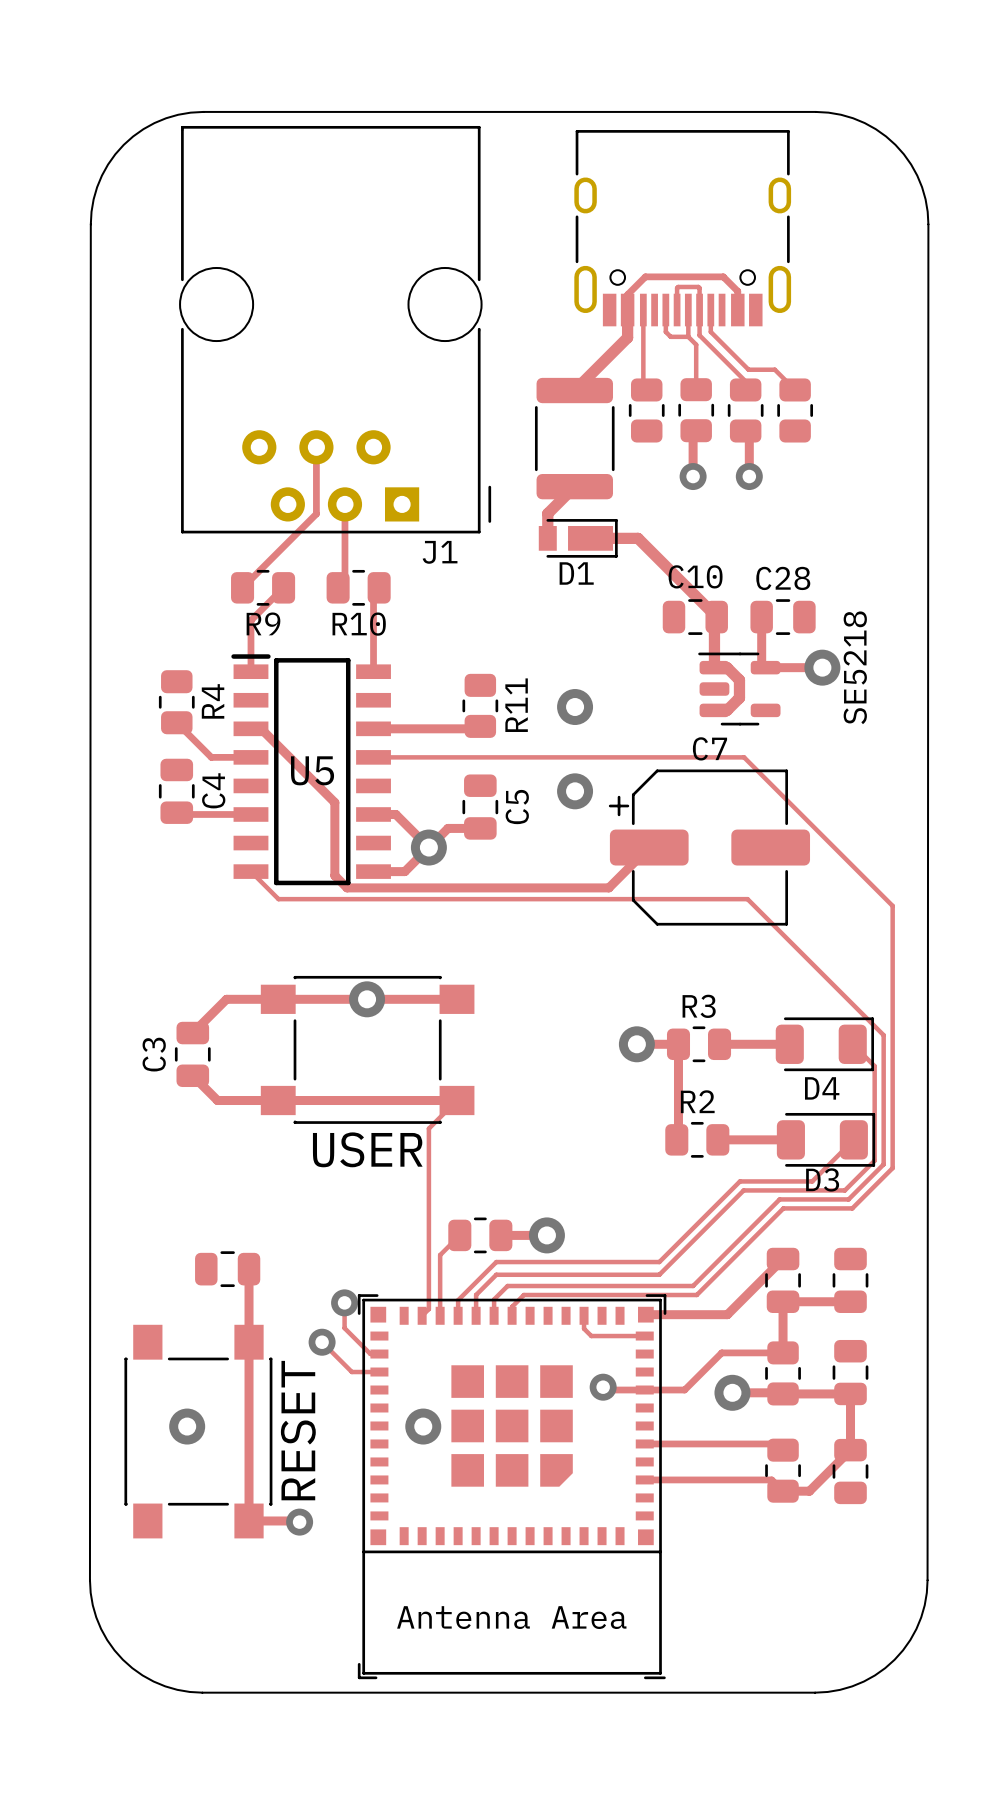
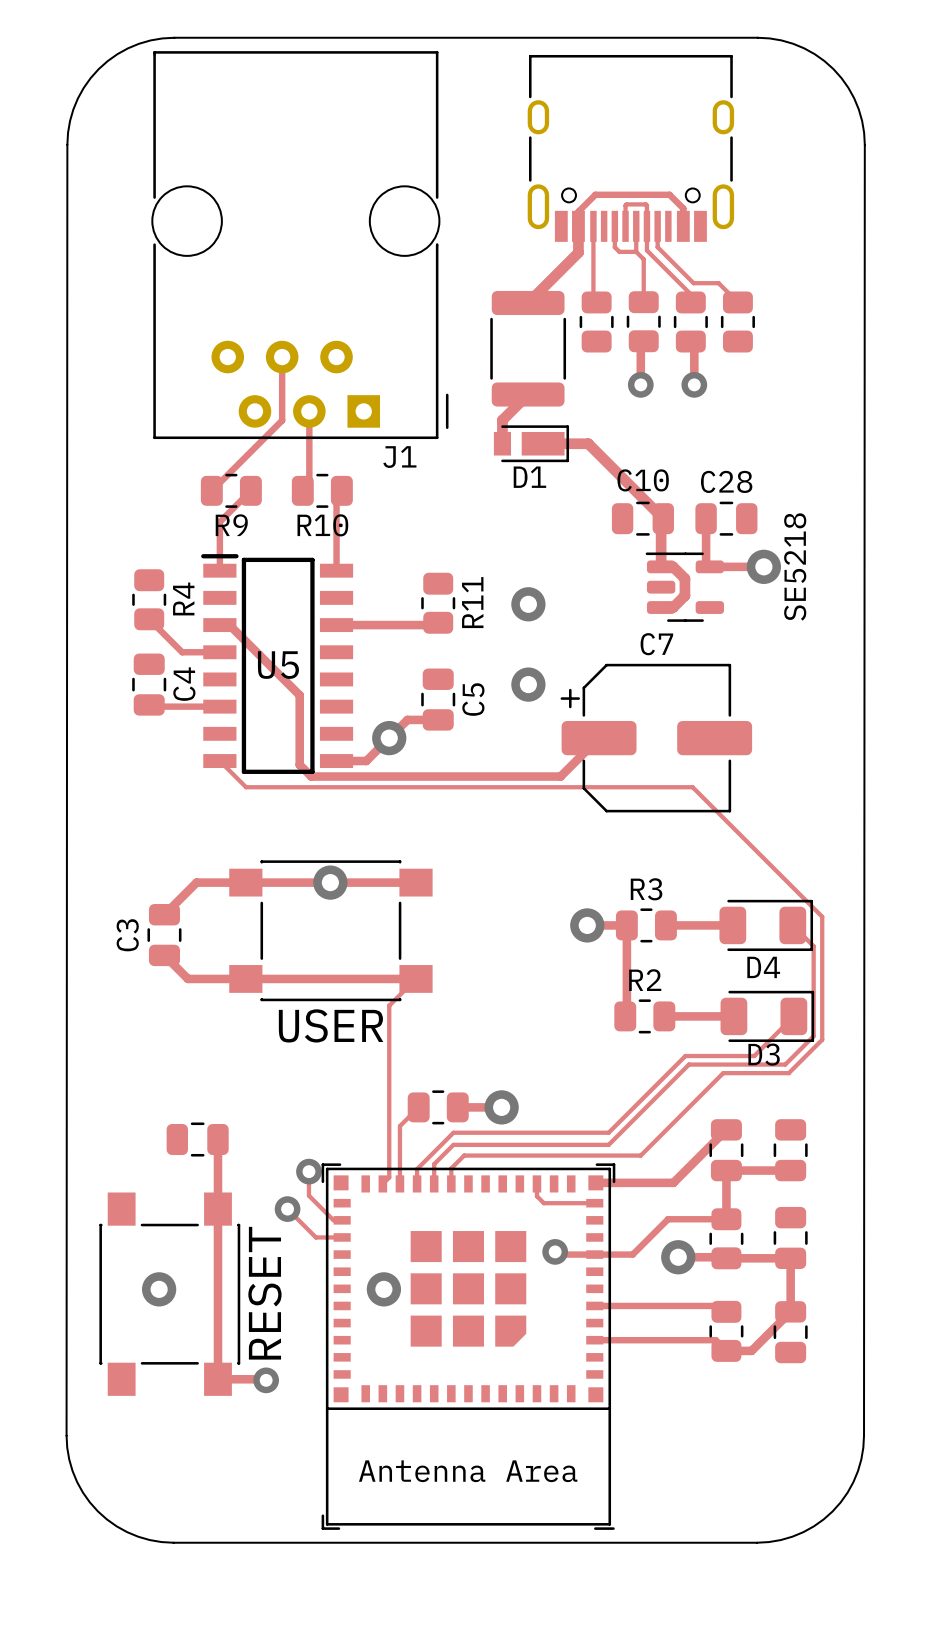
track: (373, 757) (744, 757) (892, 905) (892, 1168) (852, 1208) (783, 1208) (696, 1295) (523, 1295) (512, 1306) (512, 1315) -> none
track: (373, 814) (395, 814) (428, 847) -> none

